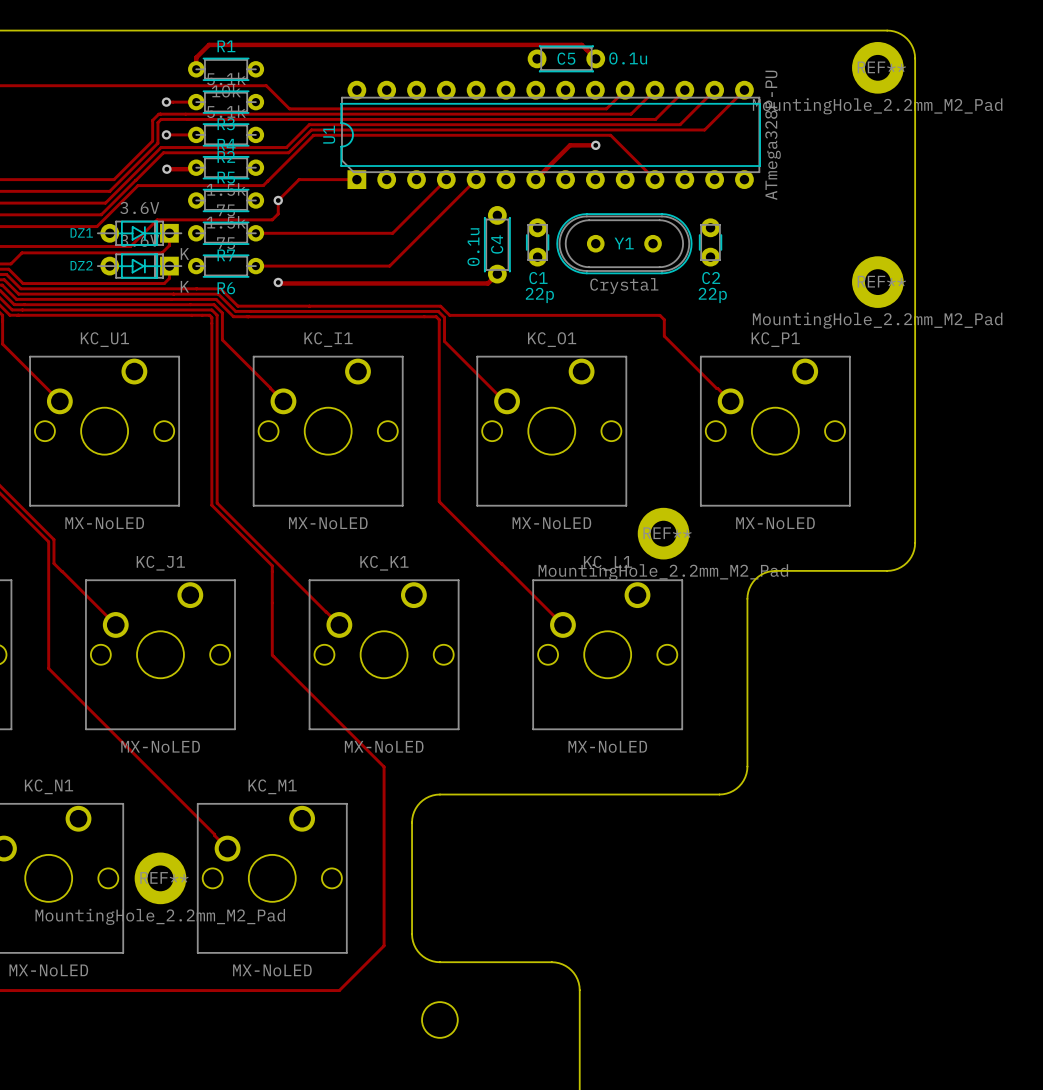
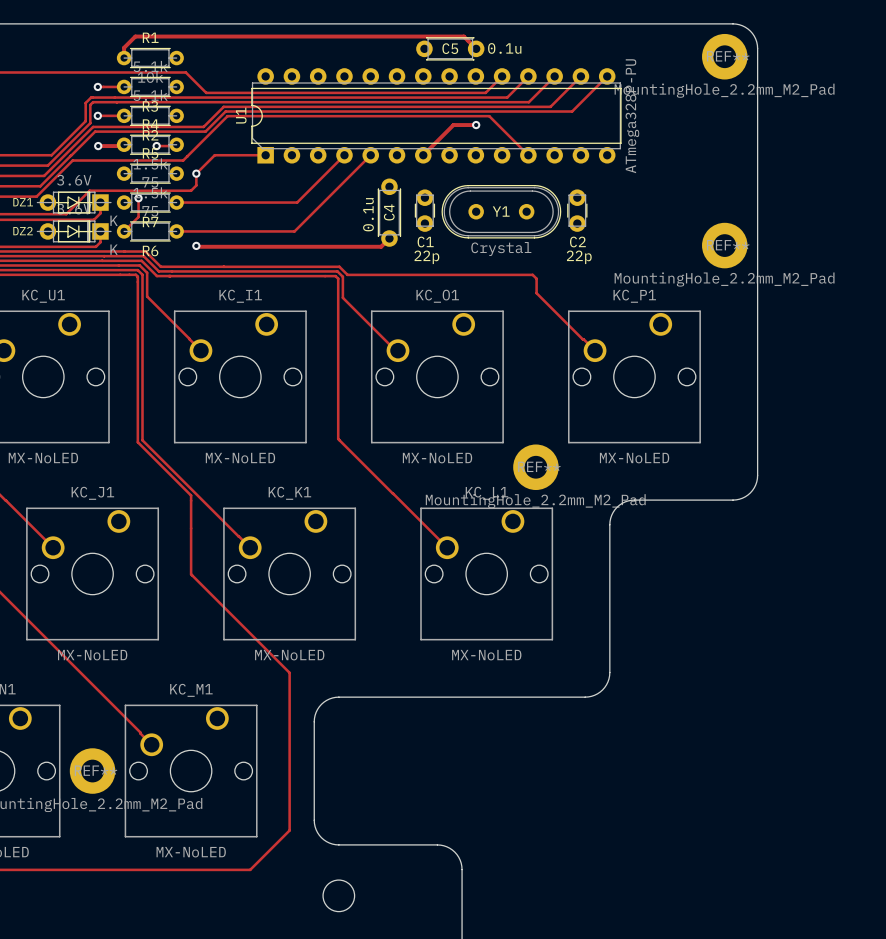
track: none -> (176, 144) (156, 146)
via: none -> (156, 146)
track: none -> (138, 198) (138, 217) (124, 230)
via: none -> (138, 198)

